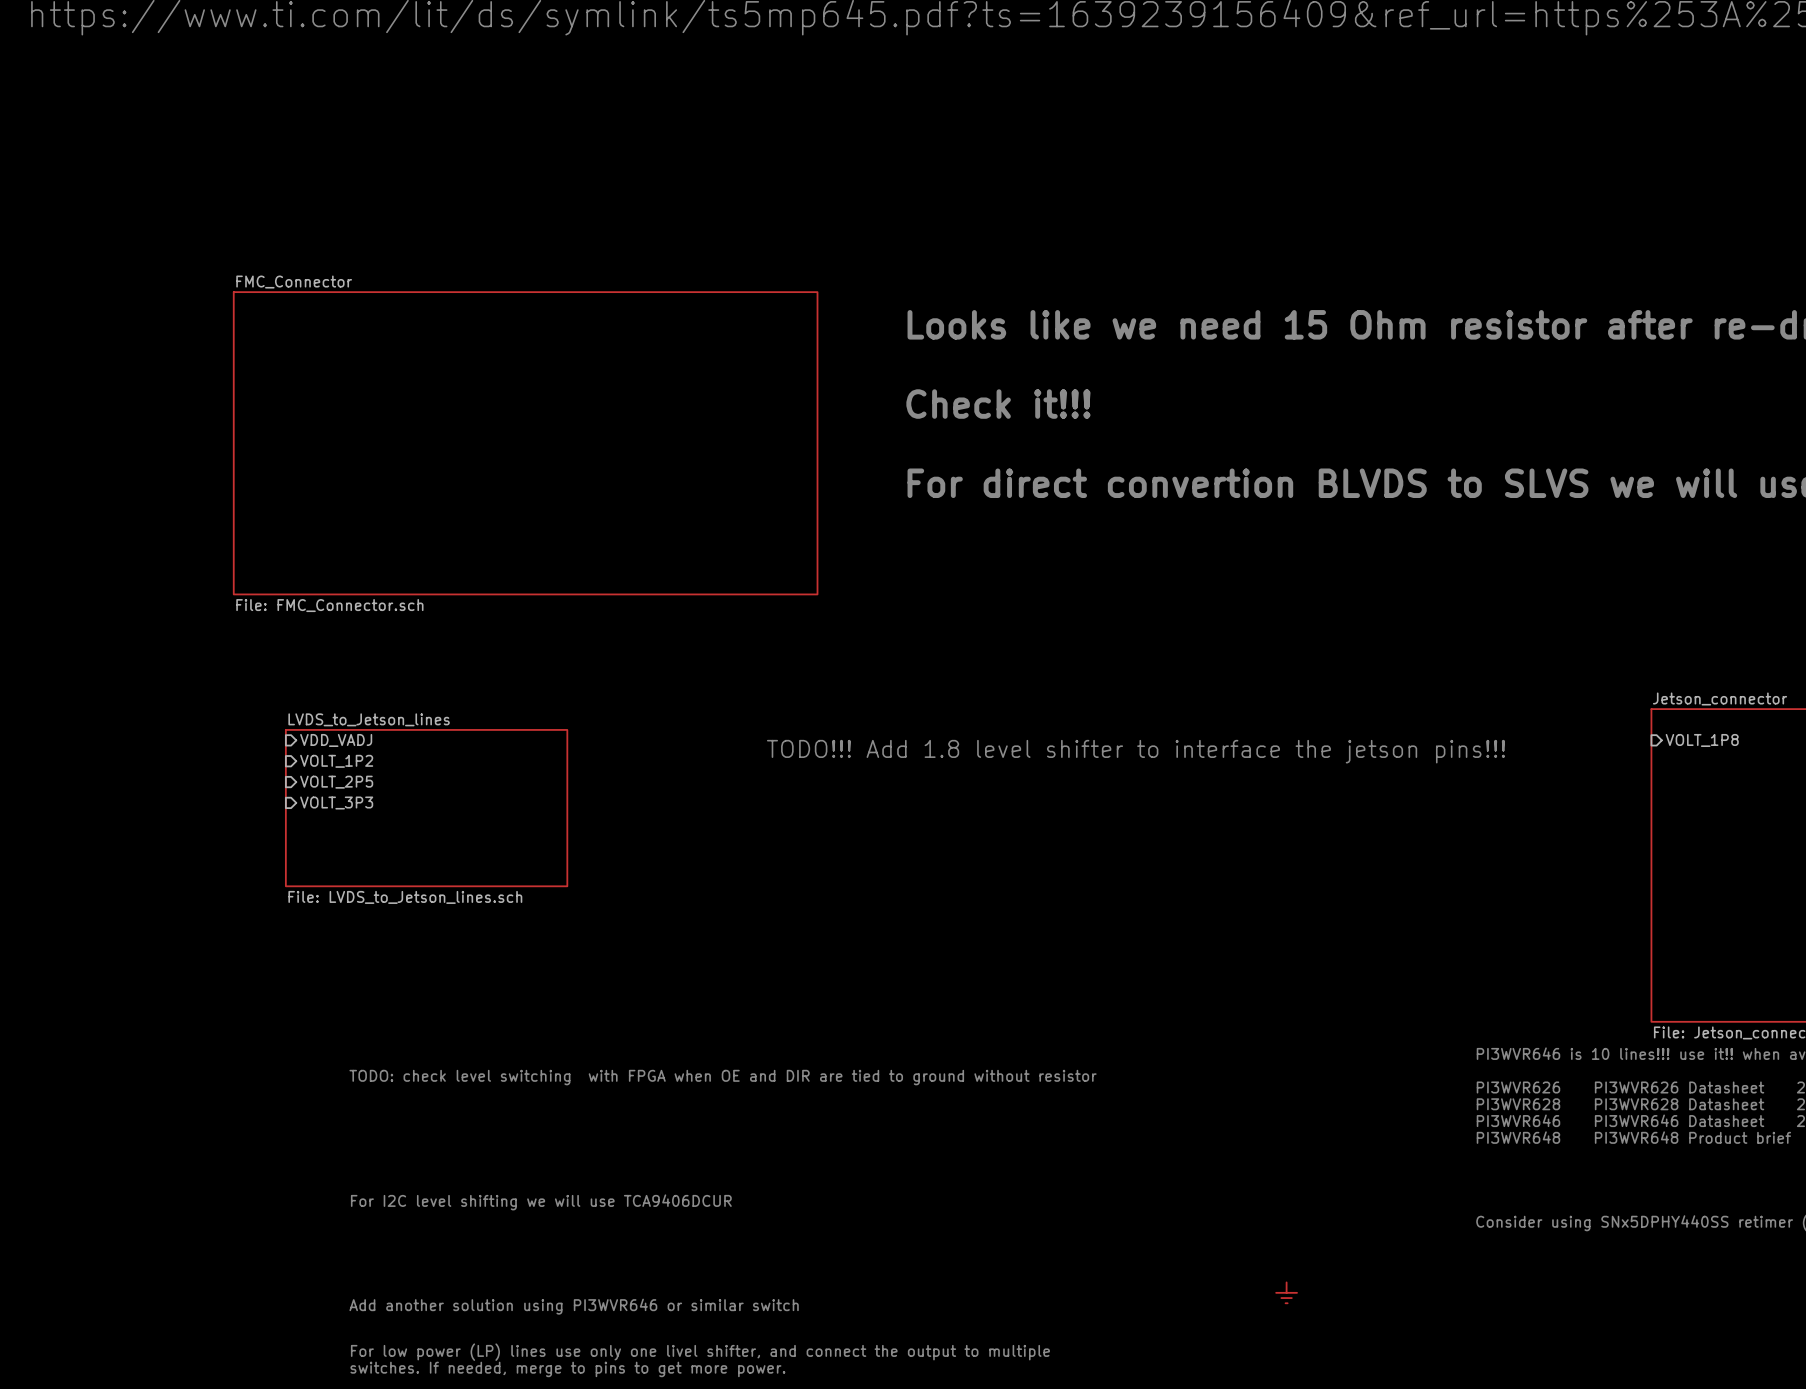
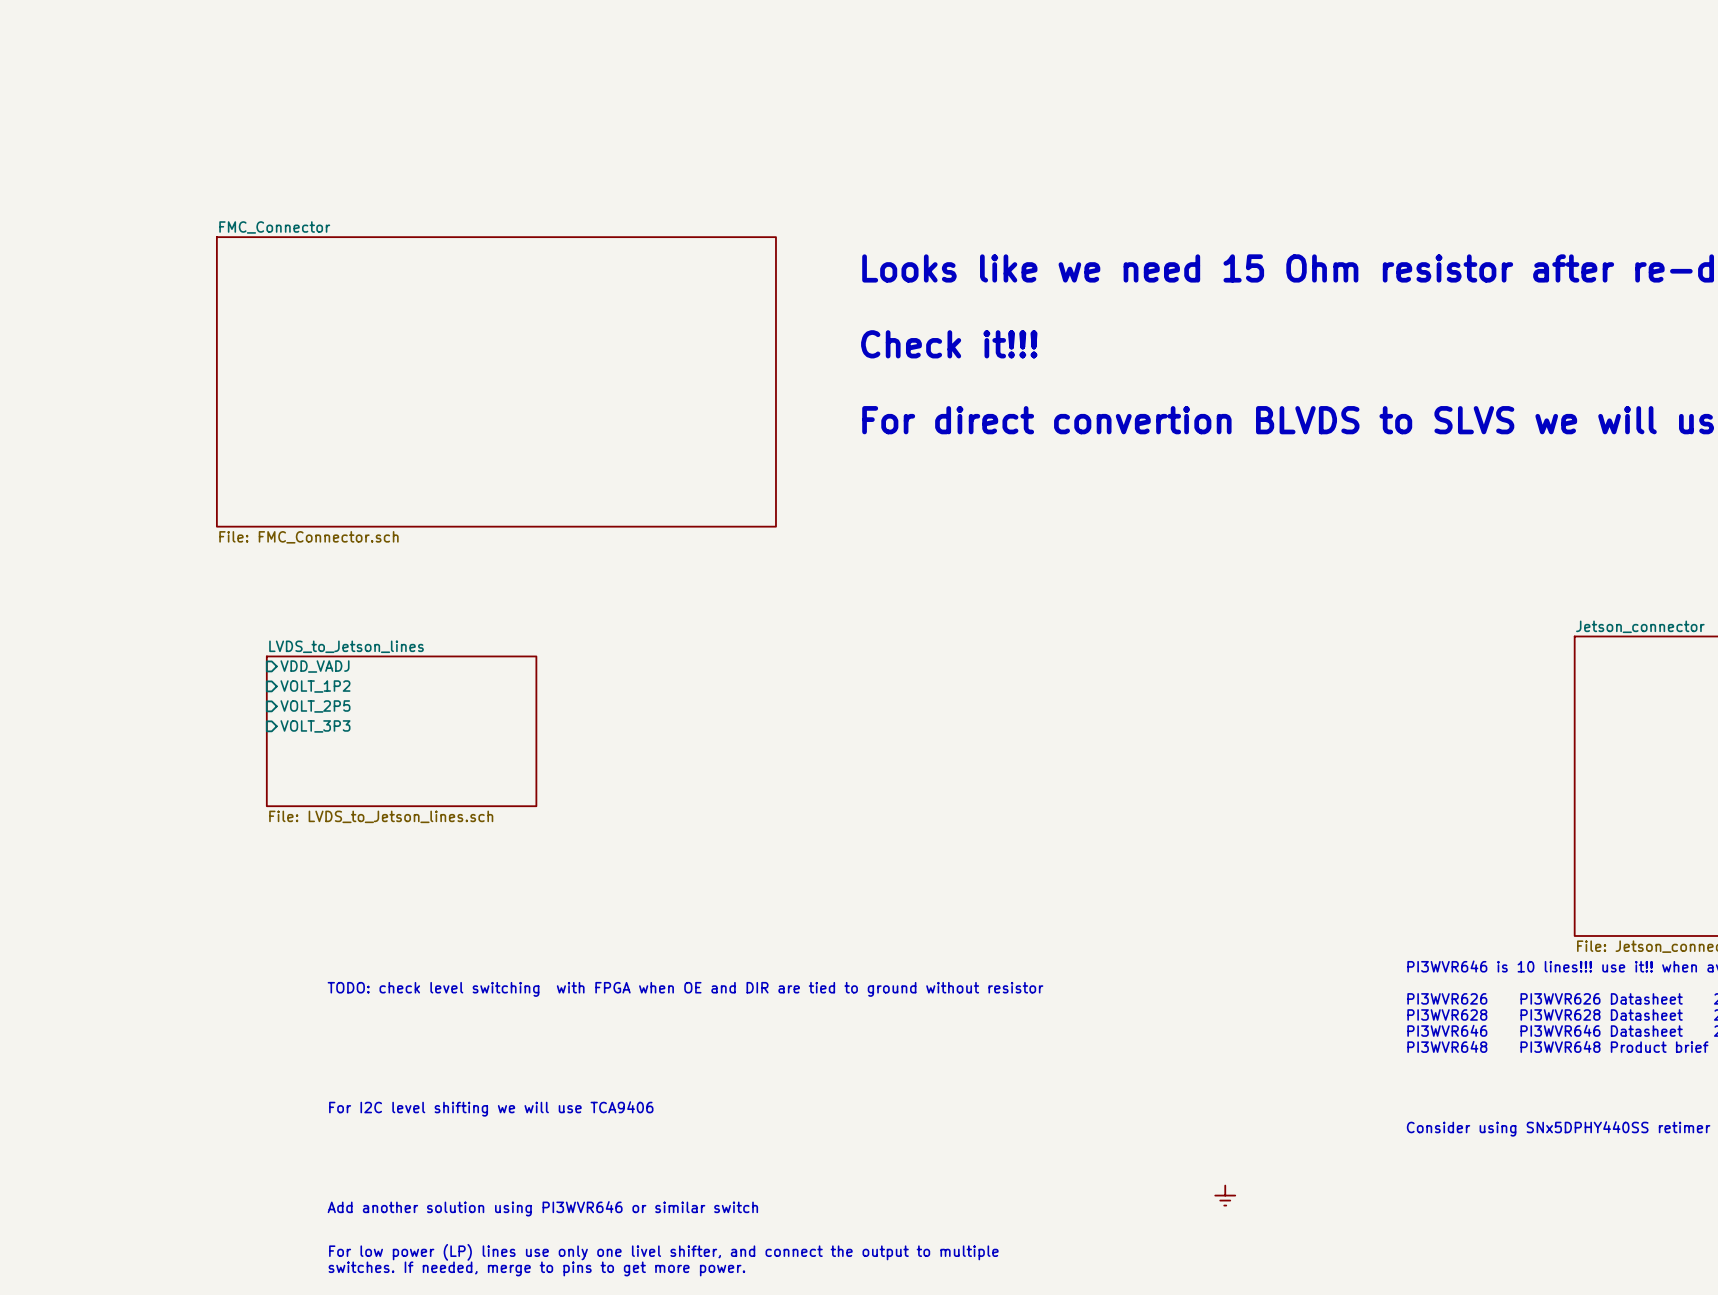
sheet pin: VOLT_1P8 (1702, 740) -> none
text: TODO!!! Add 1.8 level shifter to interface the jetson pins!!! (1135, 751) -> none
text: For I2C level shifting we will use TCA9406DCUR (541, 1202) -> For I2C level shifting we will use TCA9406 (491, 1108)

